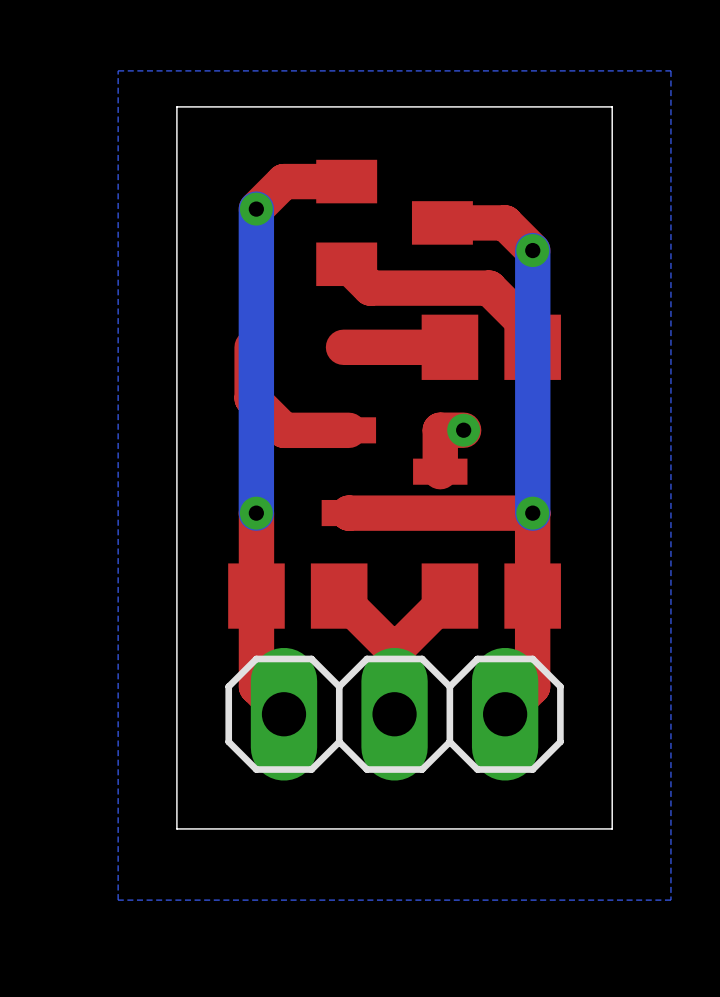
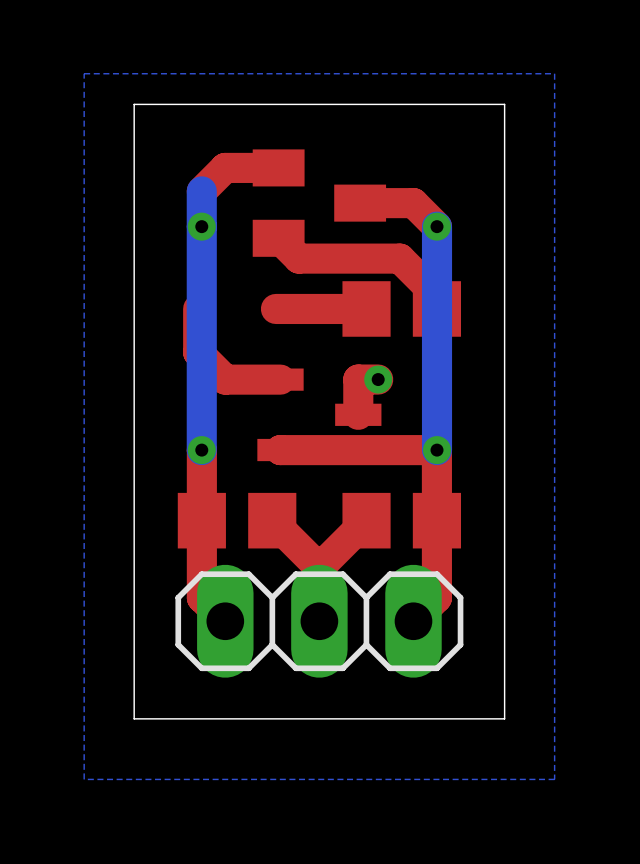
via position: (256, 209) -> (201, 226)

